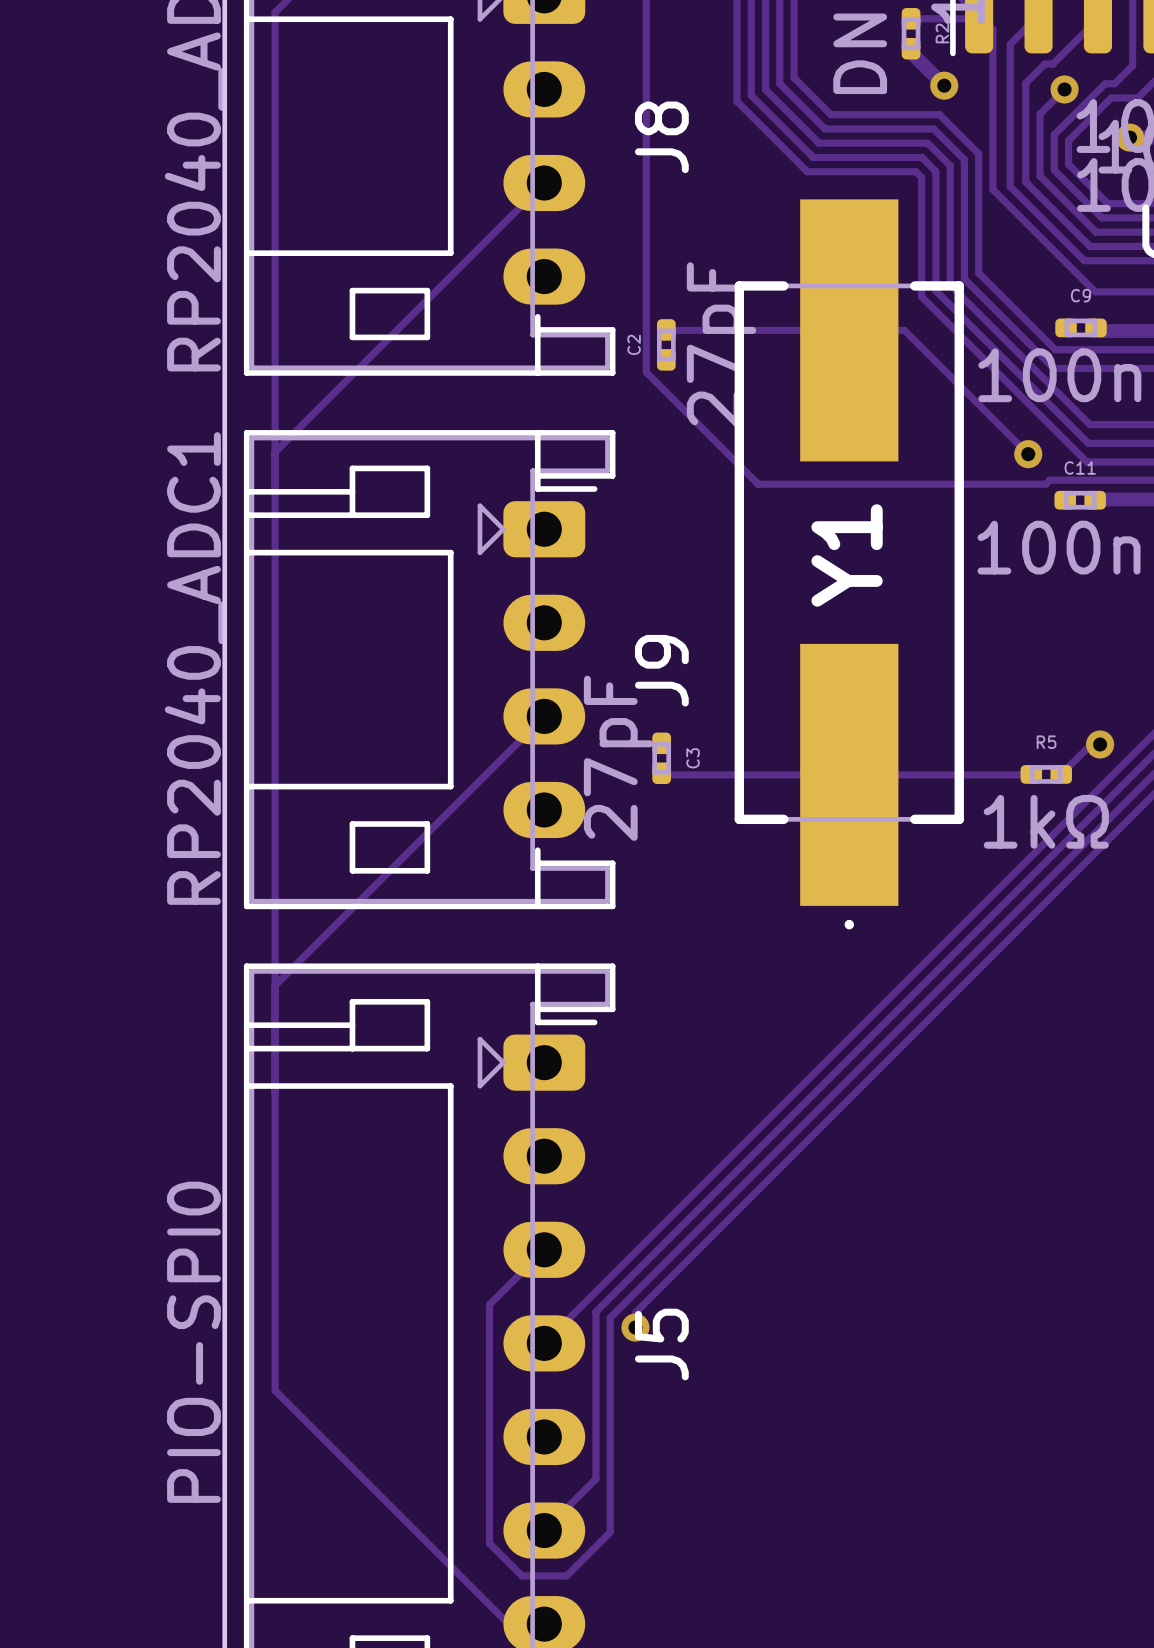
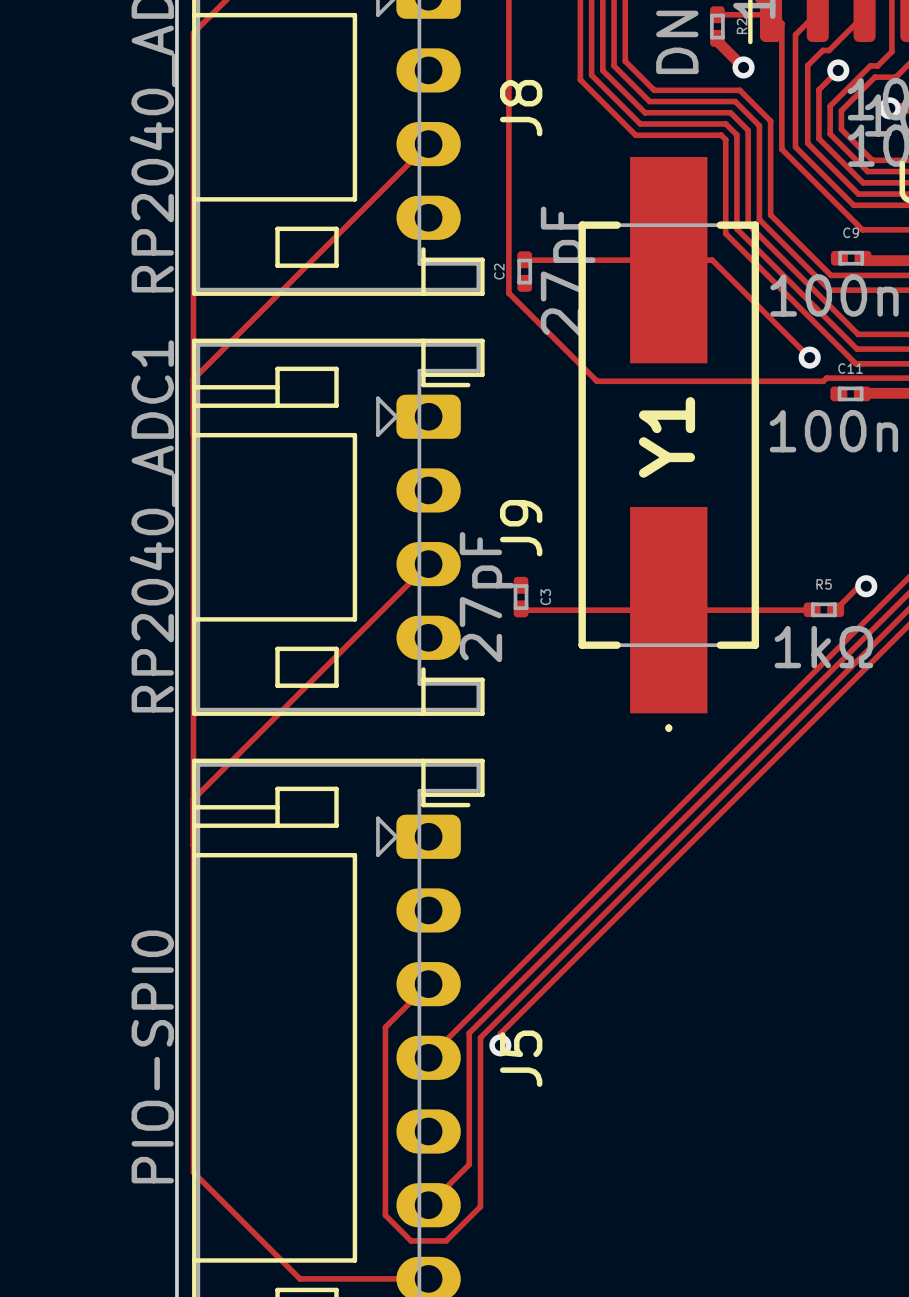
track: (275, 12) (275, 1390) (508, 1624) -> (216, 9) (193, 32) (193, 1172) (299, 1278) (400, 1278)
track: none -> (216, 356) (193, 379)
track: none -> (216, 776) (193, 799)

